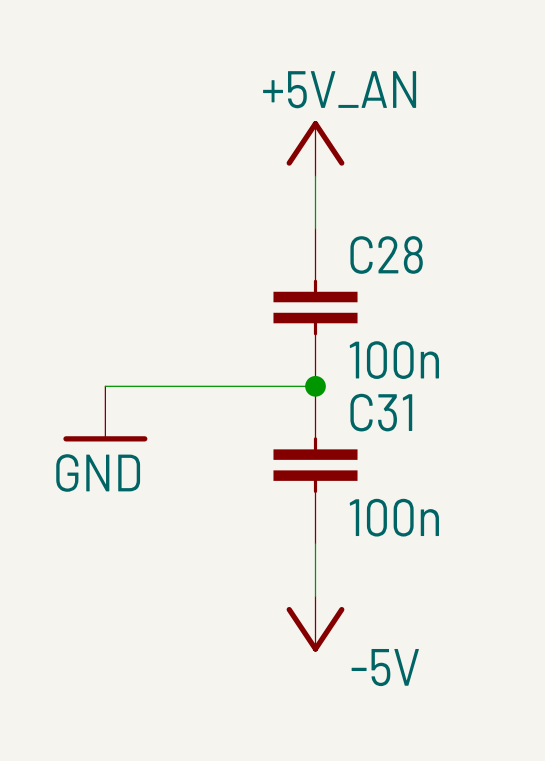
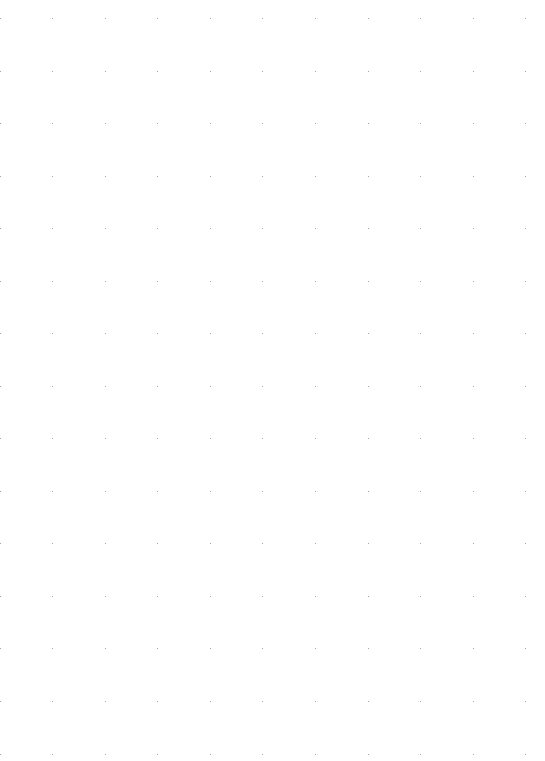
power symbol: +5V_AN (315, 148) -> none
wire: (315, 176) (315, 228) -> none
C28: 100n (315, 307) -> none
wire: (105, 386) (315, 386) -> none
junction: (315, 386) -> none
power symbol: GND (105, 413) -> none
C31: 100n (315, 465) -> none
wire: (315, 543) (315, 596) -> none
power symbol: -5V (315, 624) -> none

